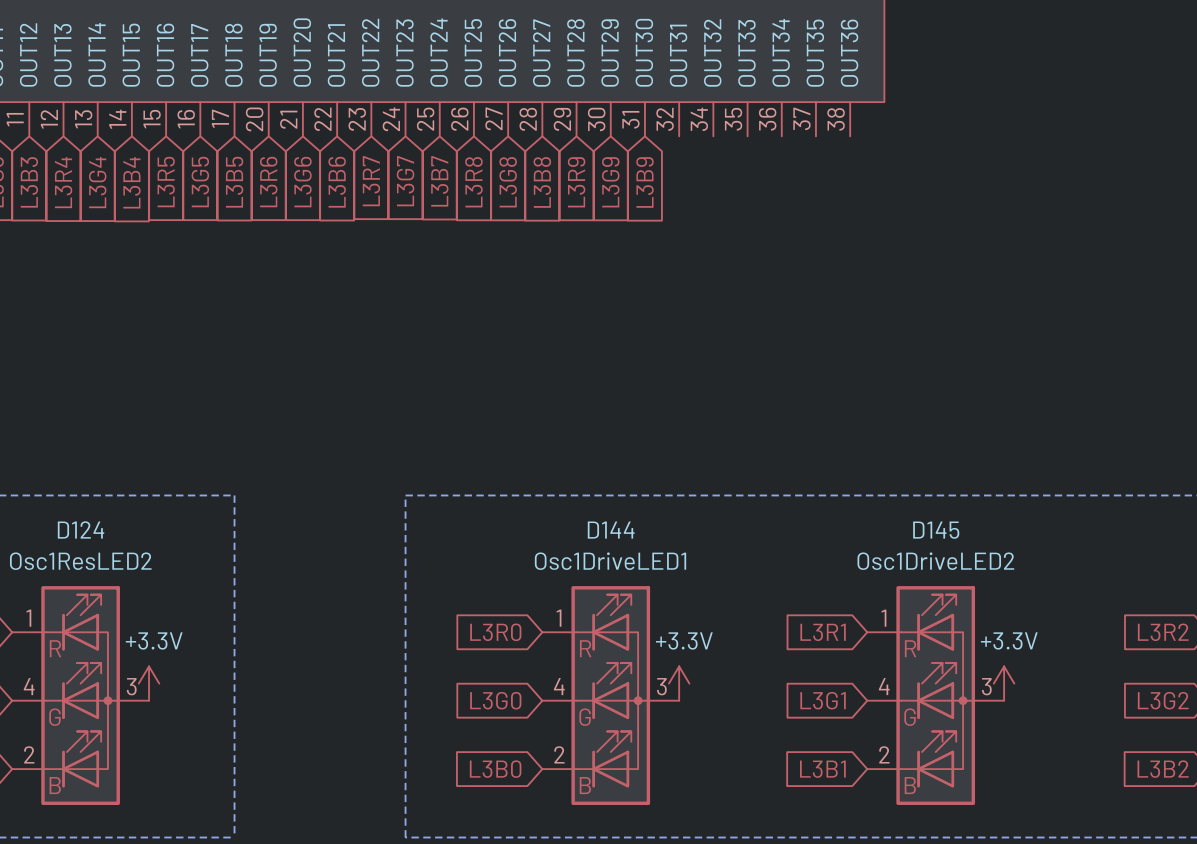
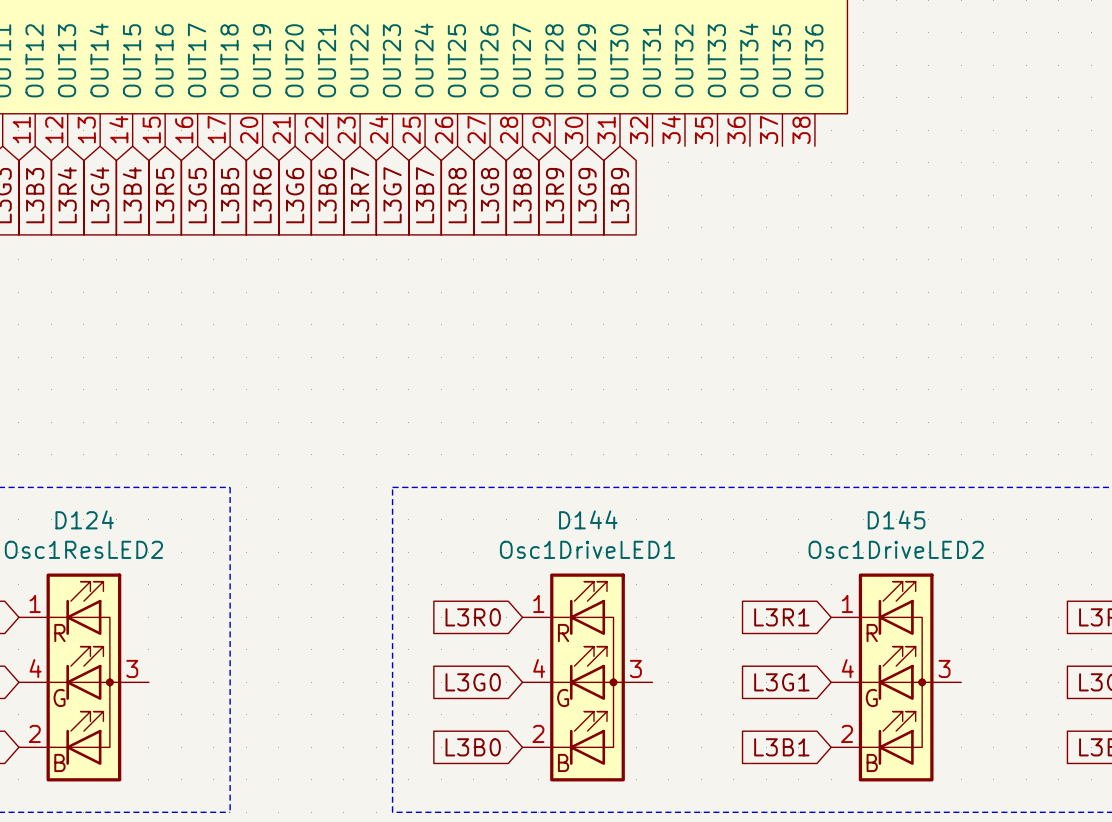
power symbol: +3.3V (149, 683) -> none
power symbol: +3.3V (679, 683) -> none
power symbol: +3.3V (1004, 683) -> none

